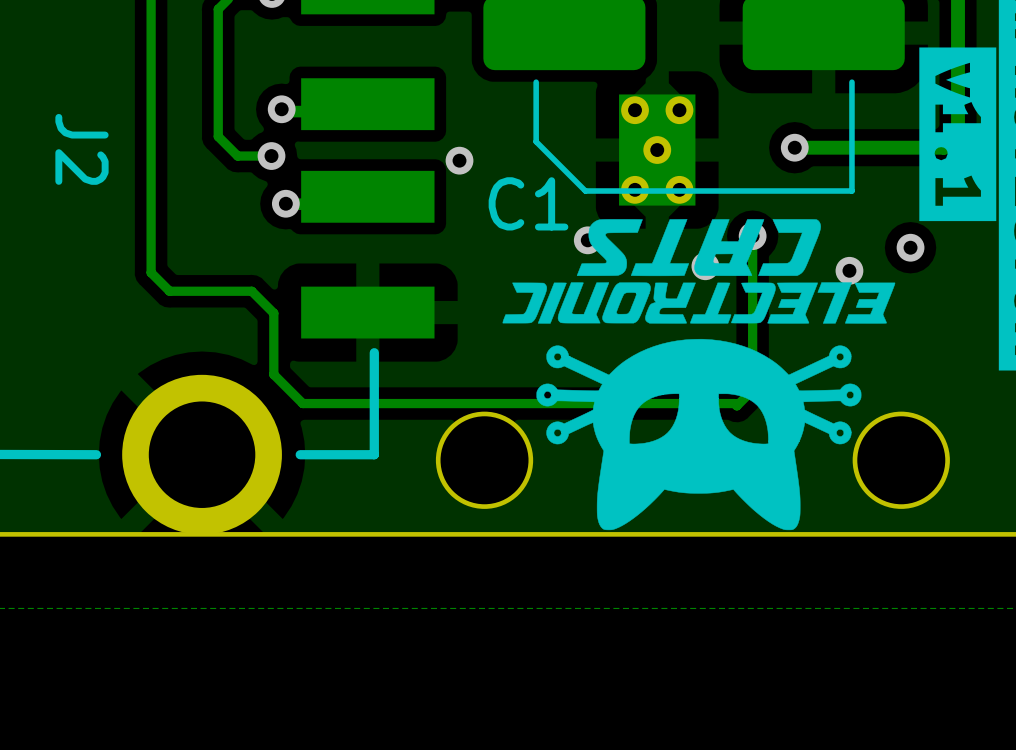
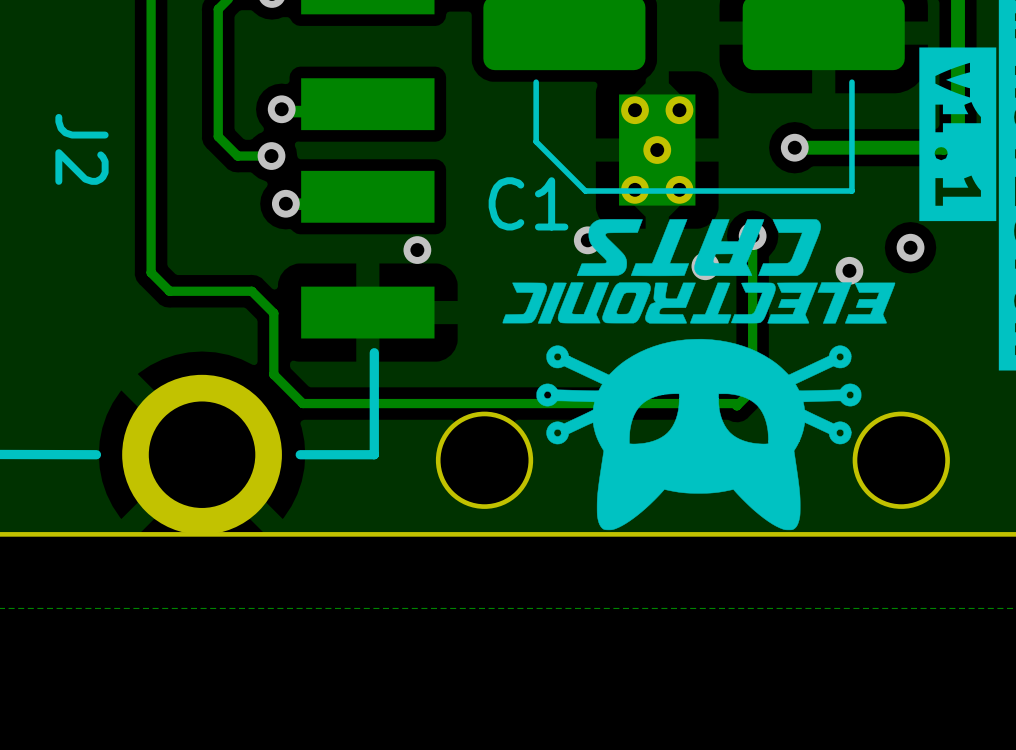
via position: (459, 160) -> (417, 250)

